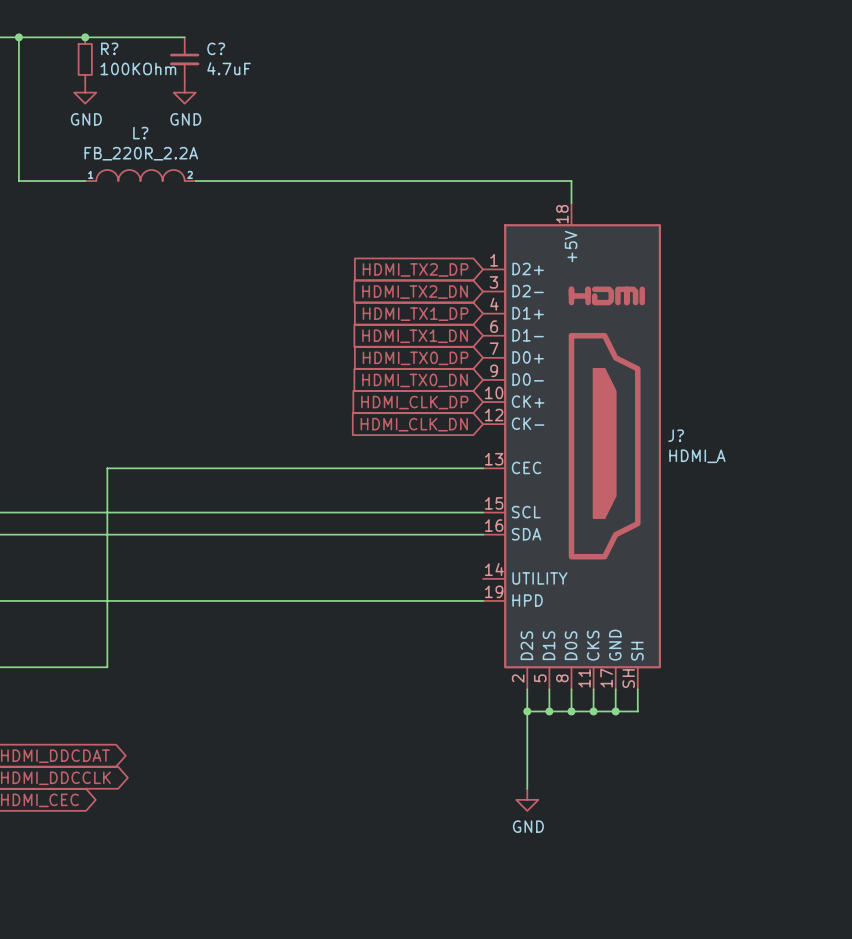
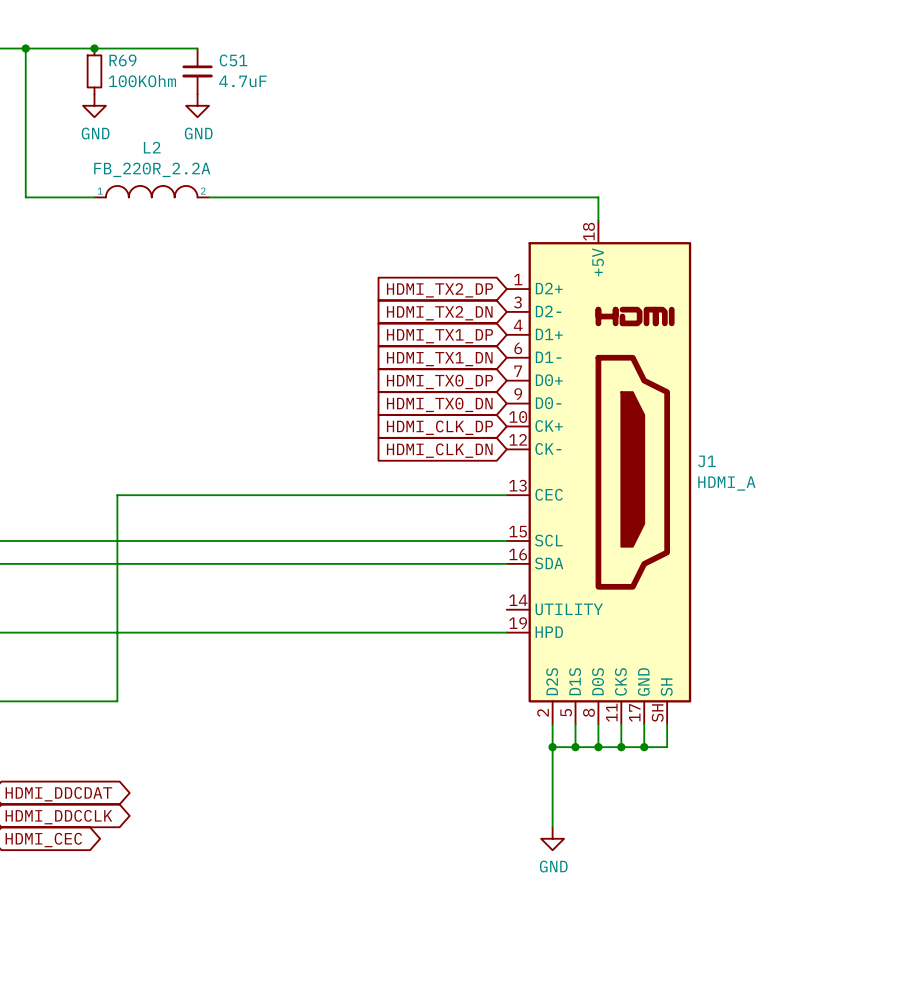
R? name: R? (109, 48) -> R69 (122, 60)
C? name: C? (216, 48) -> C51 (233, 60)
L? name: L? (140, 133) -> L2 (152, 147)
J? name: J? (676, 435) -> J1 (706, 461)

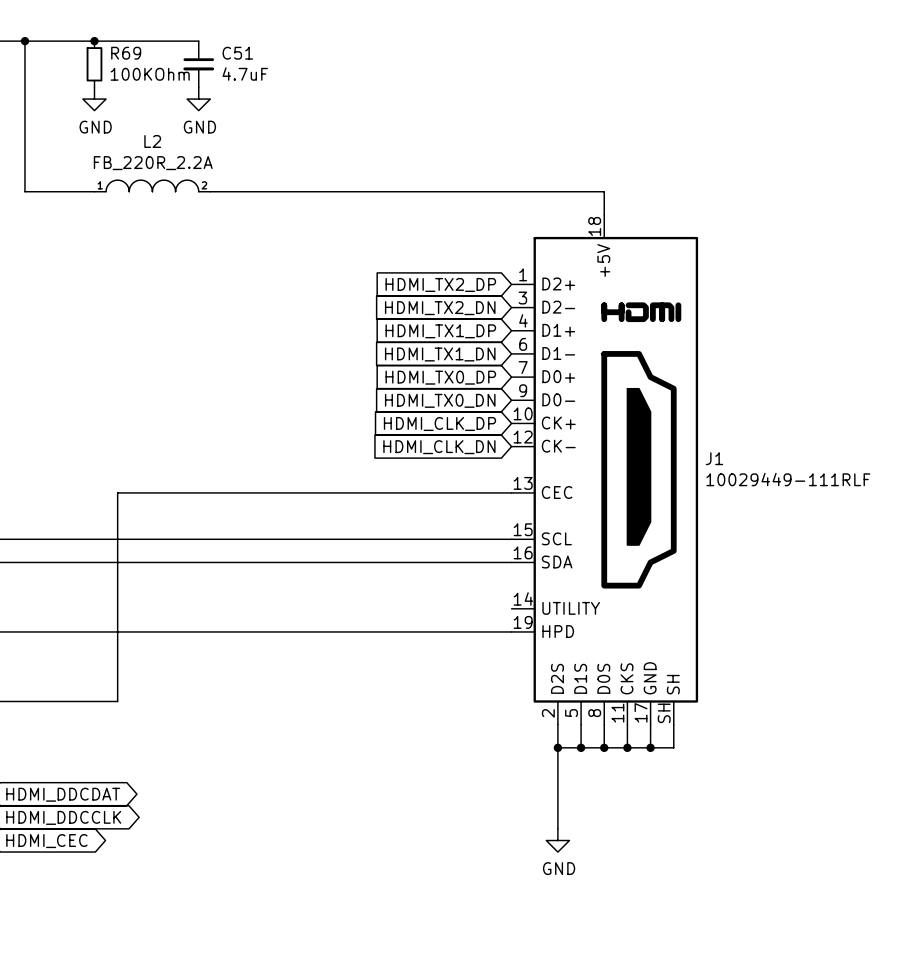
J1 value: HDMI_A (726, 483) -> 10029449-111RLF (788, 479)

